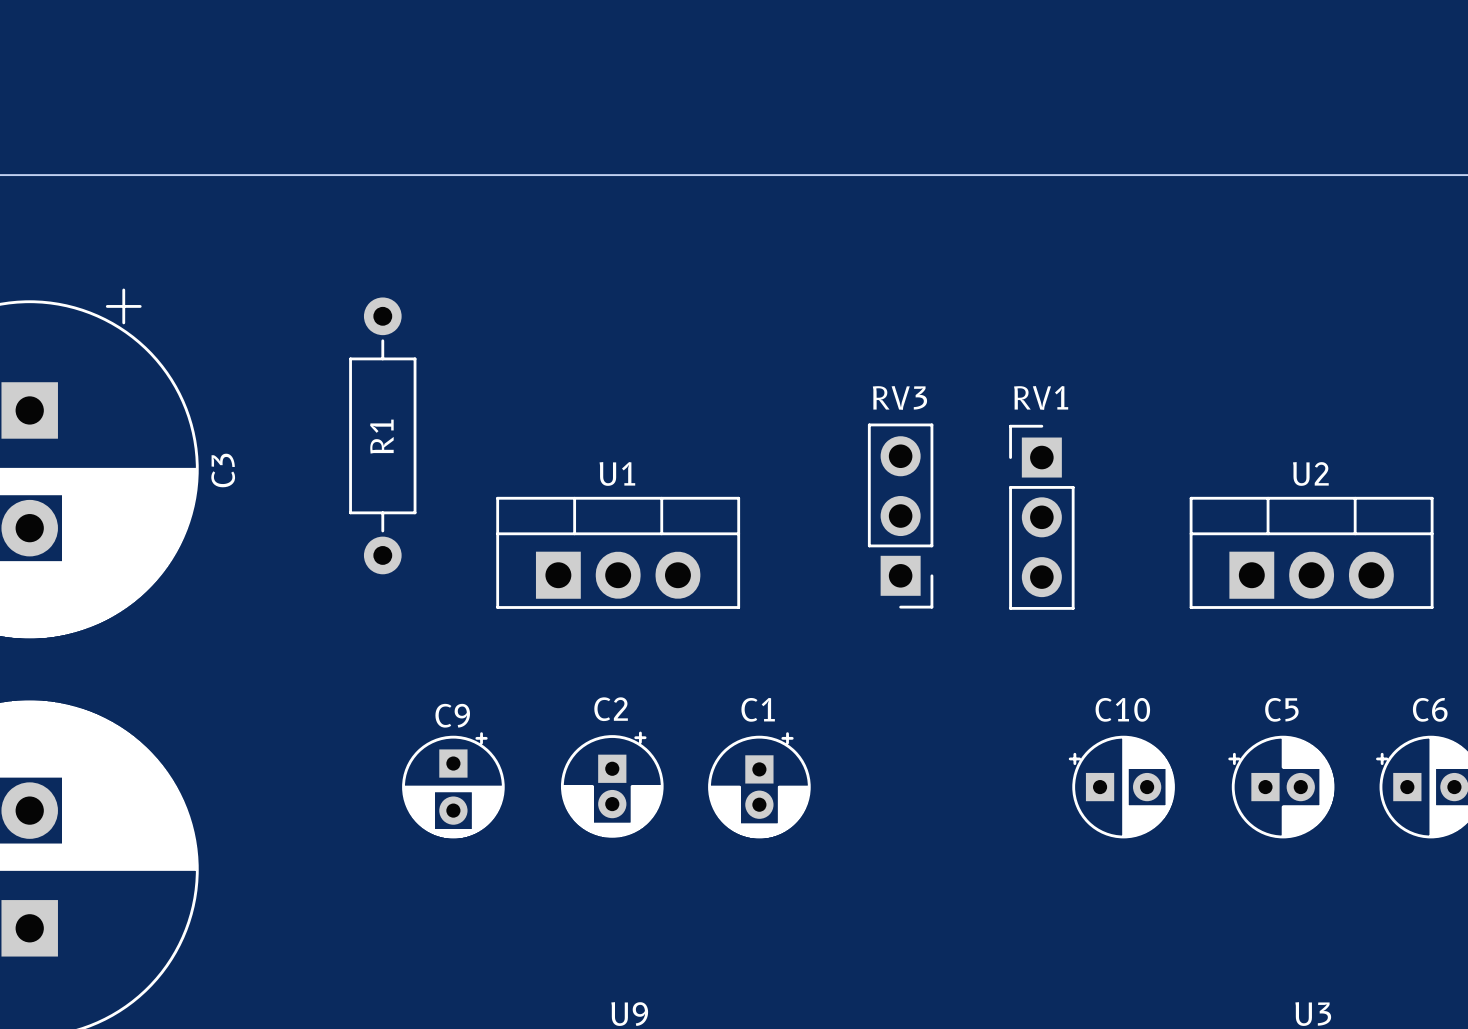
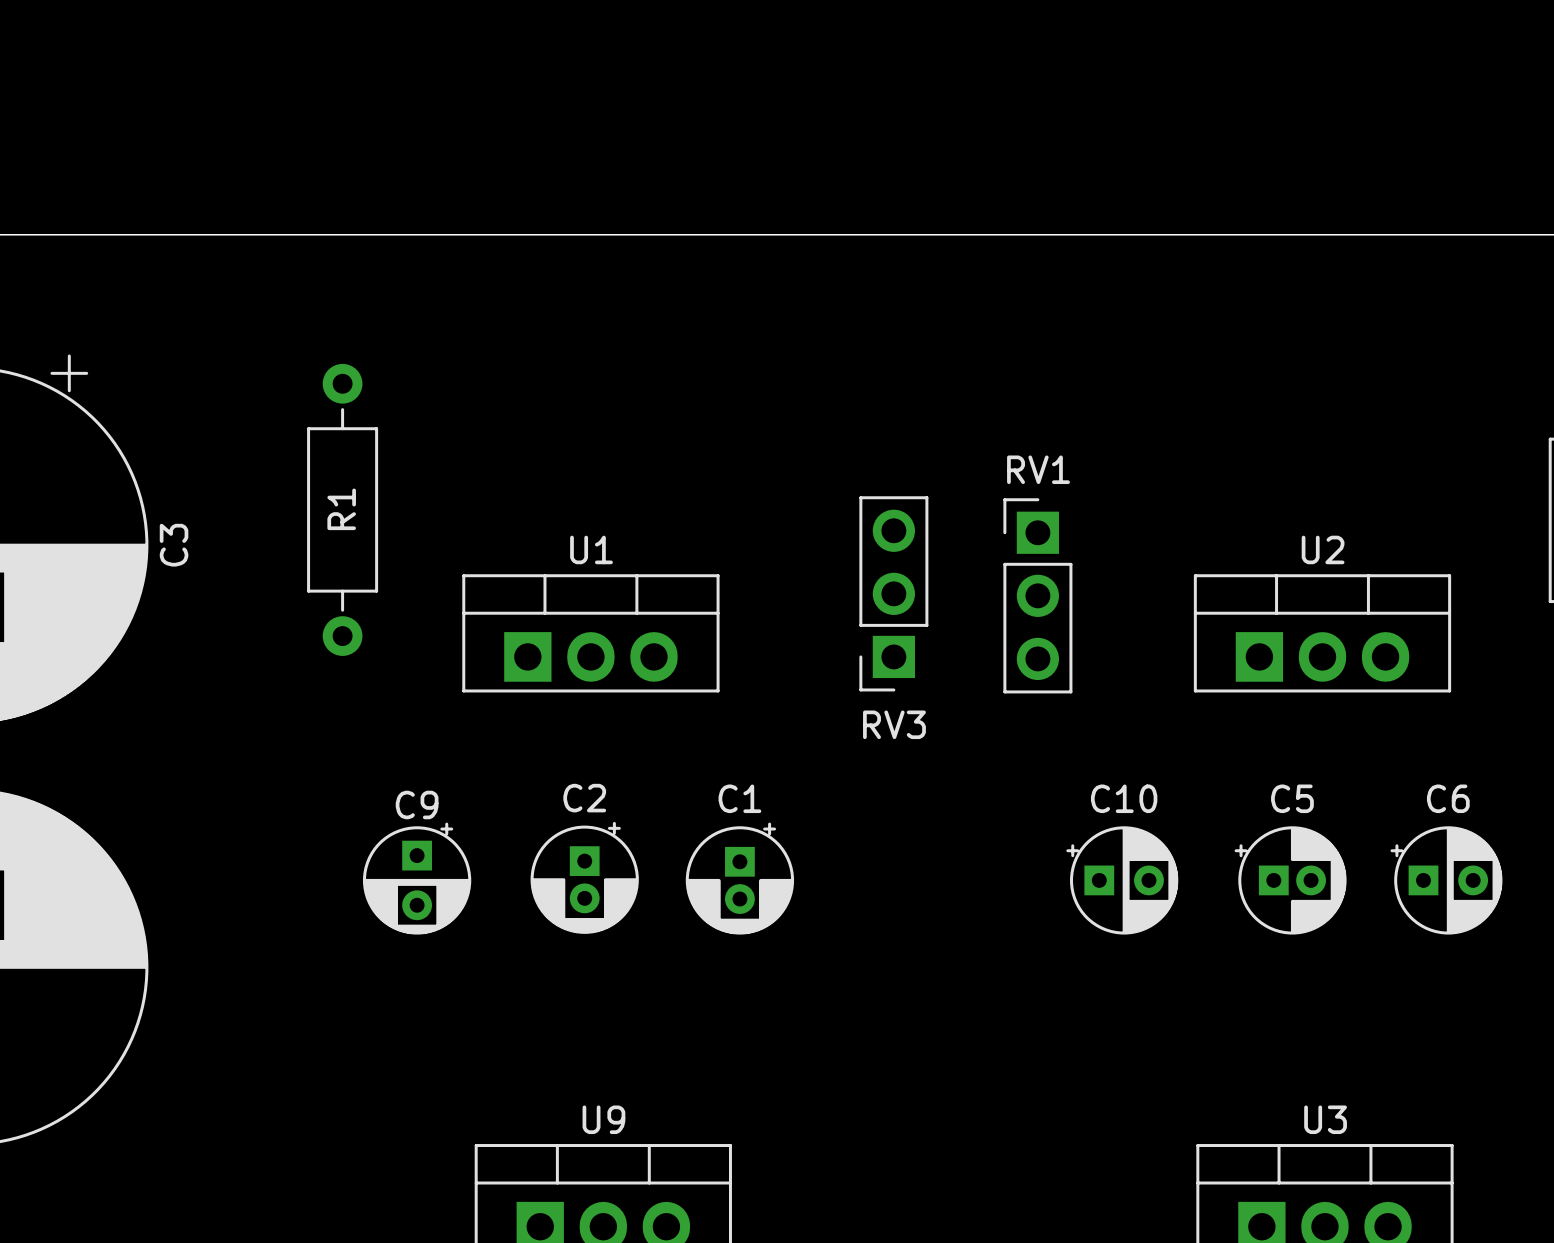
RV3 name position: RV3 (899, 397) -> RV3 (894, 724)
RV3 footprint: [867, 423, 934, 609] -> [859, 496, 929, 692]

